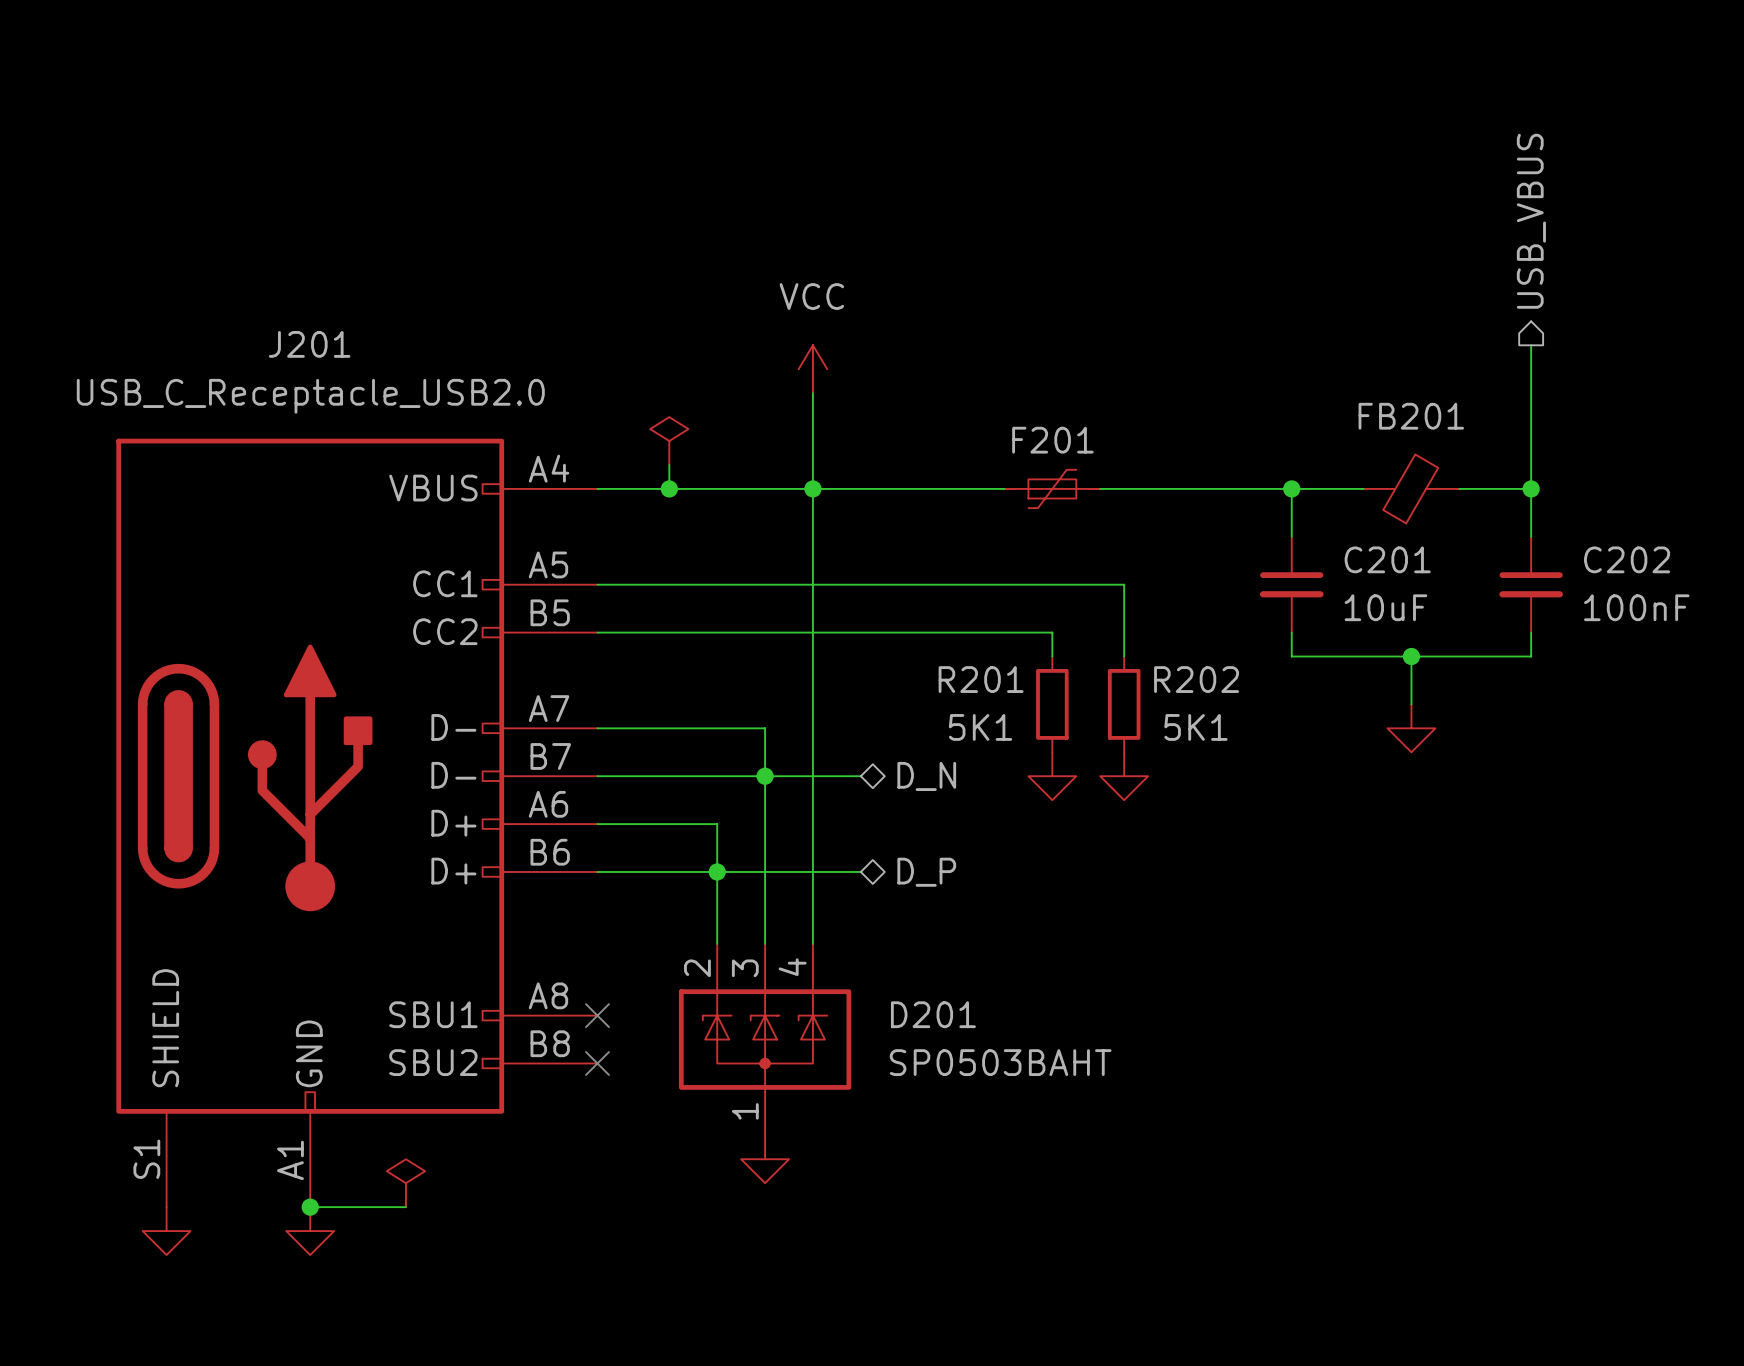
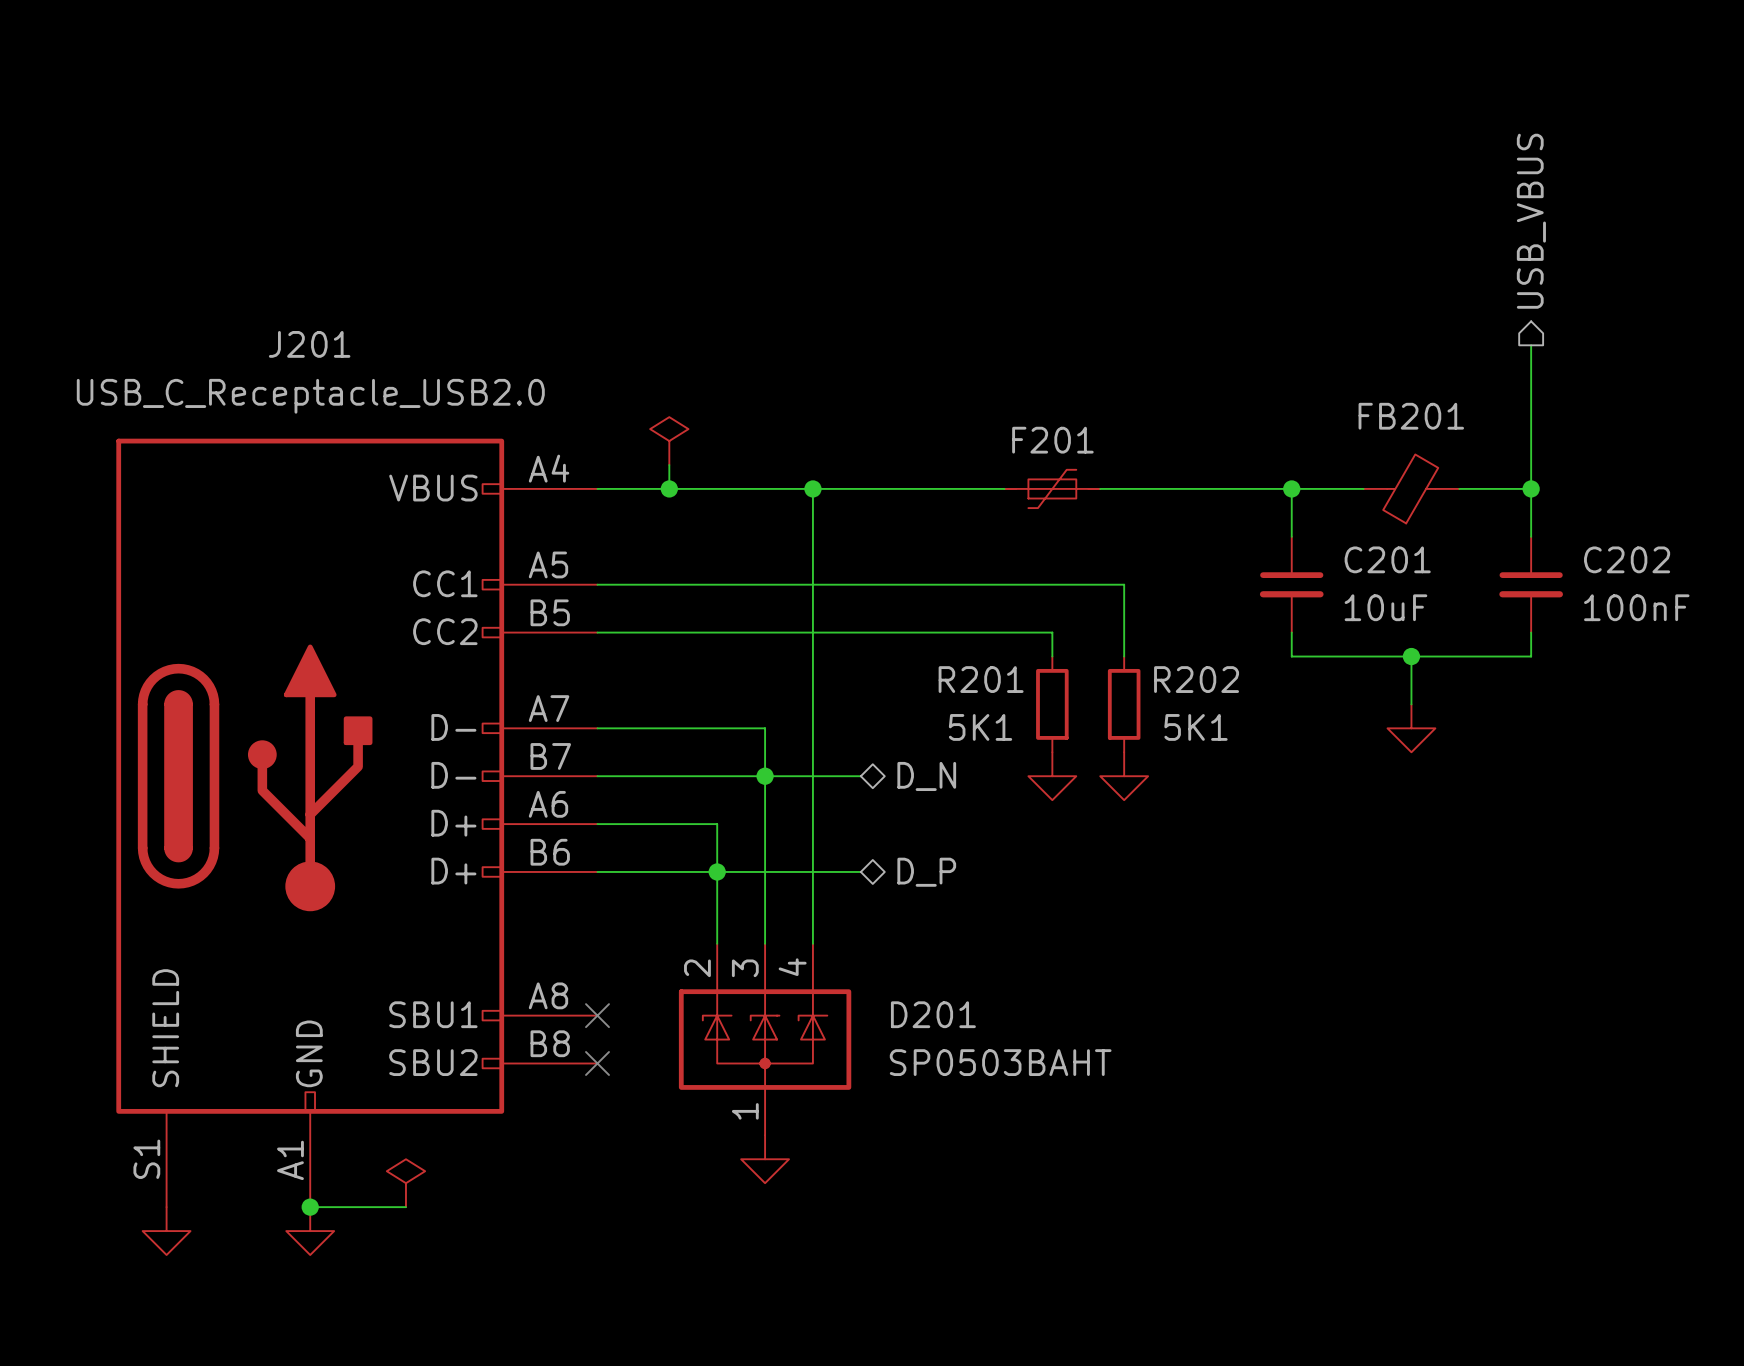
power symbol: VCC (812, 369) -> none
wire: (812, 393) (812, 488) -> none

